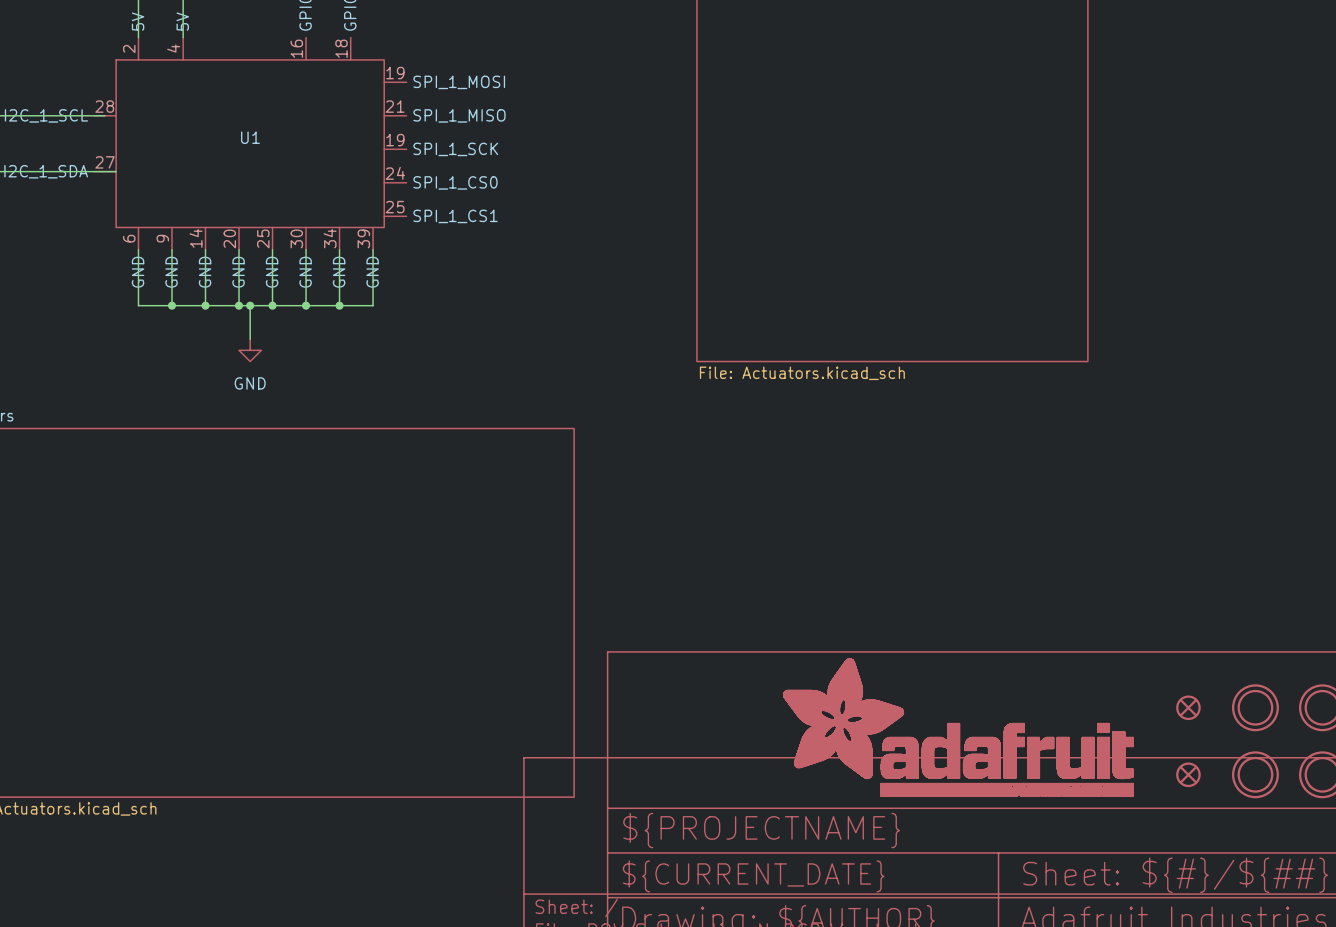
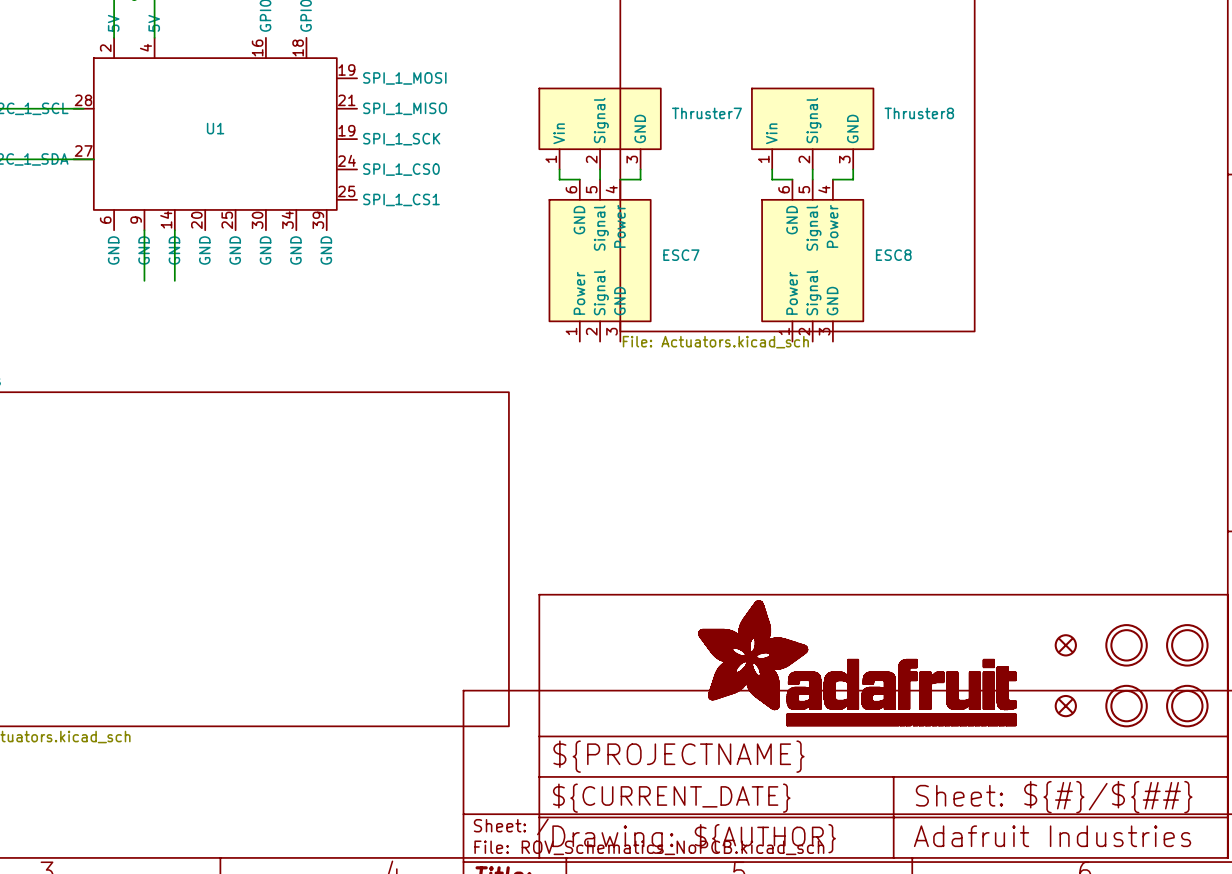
Thruster7: none -> (600, 128)
Thruster8: none -> (812, 128)
wire: none -> (559, 169) (559, 179) (579, 179)
wire: none -> (600, 169) (600, 179)
wire: none -> (640, 169) (640, 179) (620, 179)
wire: none -> (772, 169) (772, 179) (792, 179)
wire: none -> (812, 169) (812, 179)
wire: none -> (853, 169) (853, 179) (832, 179)
wire: (138, 249) (138, 305) (373, 305) (373, 249) -> none
wire: (239, 249) (239, 305) -> none
wire: (272, 249) (272, 305) -> none
wire: (306, 249) (306, 305) -> none
wire: (339, 249) (339, 305) -> none
ESC7: none -> (600, 260)
ESC8: none -> (812, 260)
junction: (171, 305) -> none
junction: (205, 305) -> none
junction: (239, 305) -> none
wire: (250, 305) (250, 339) -> none
junction: (250, 305) -> none
junction: (272, 305) -> none
junction: (306, 305) -> none
junction: (339, 305) -> none
power symbol: GND (250, 350) -> none

